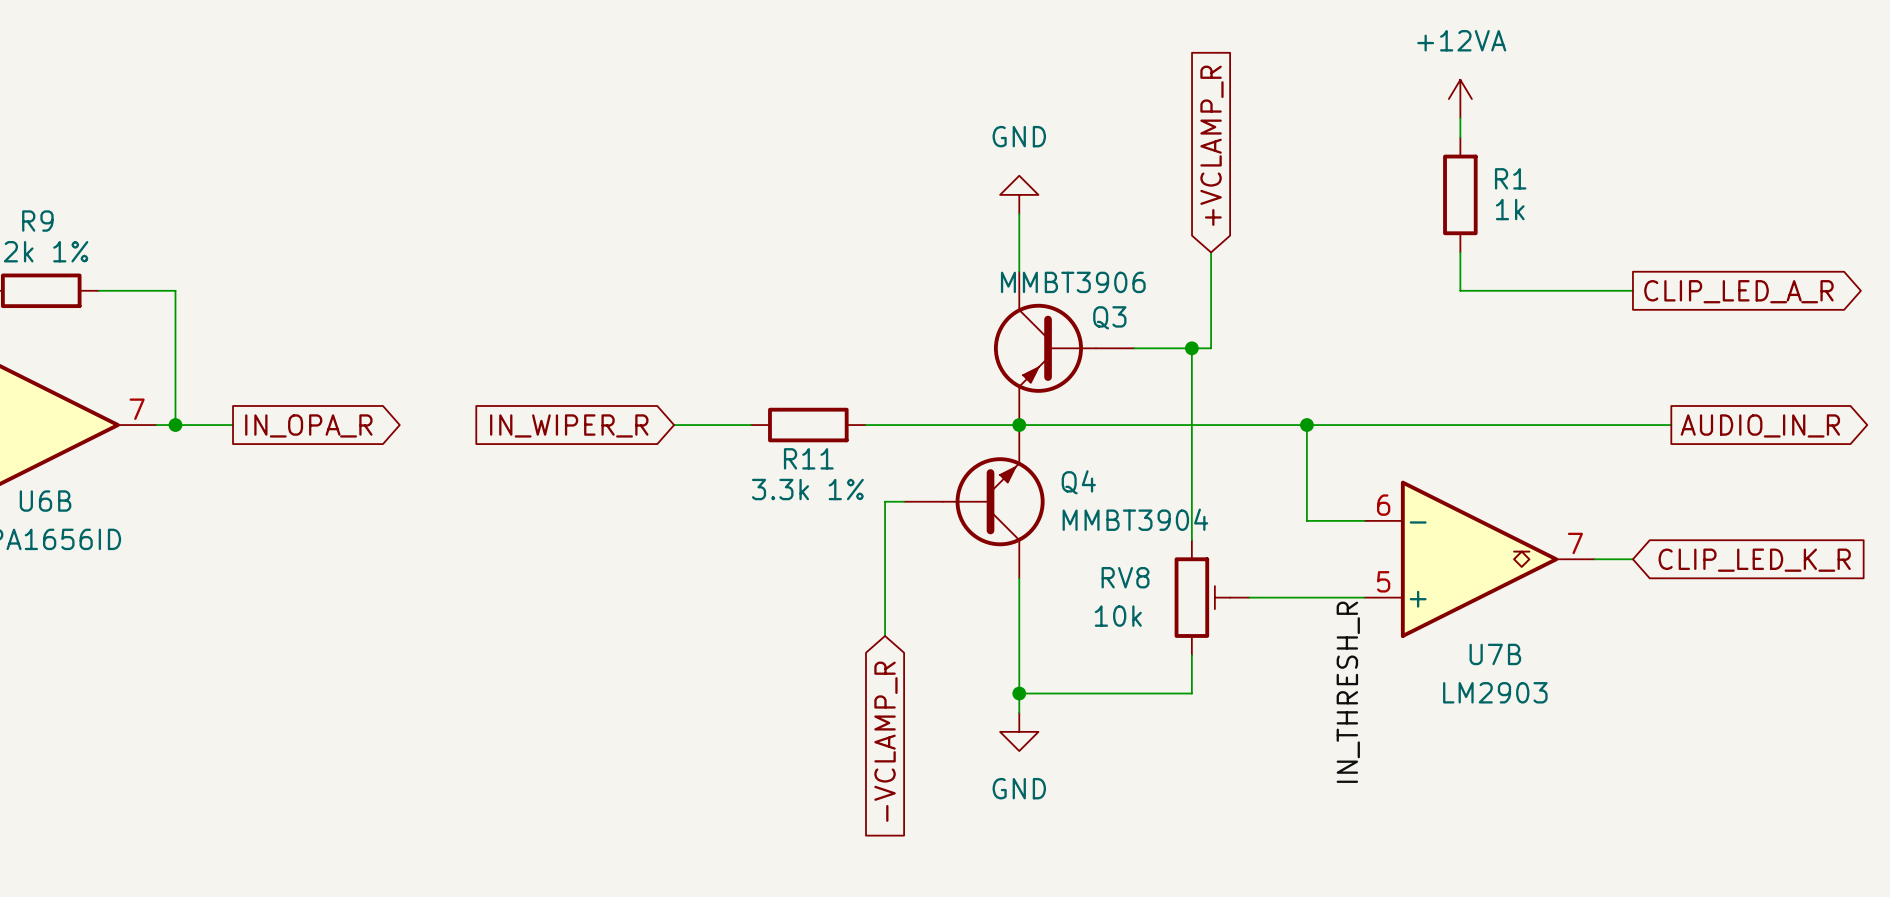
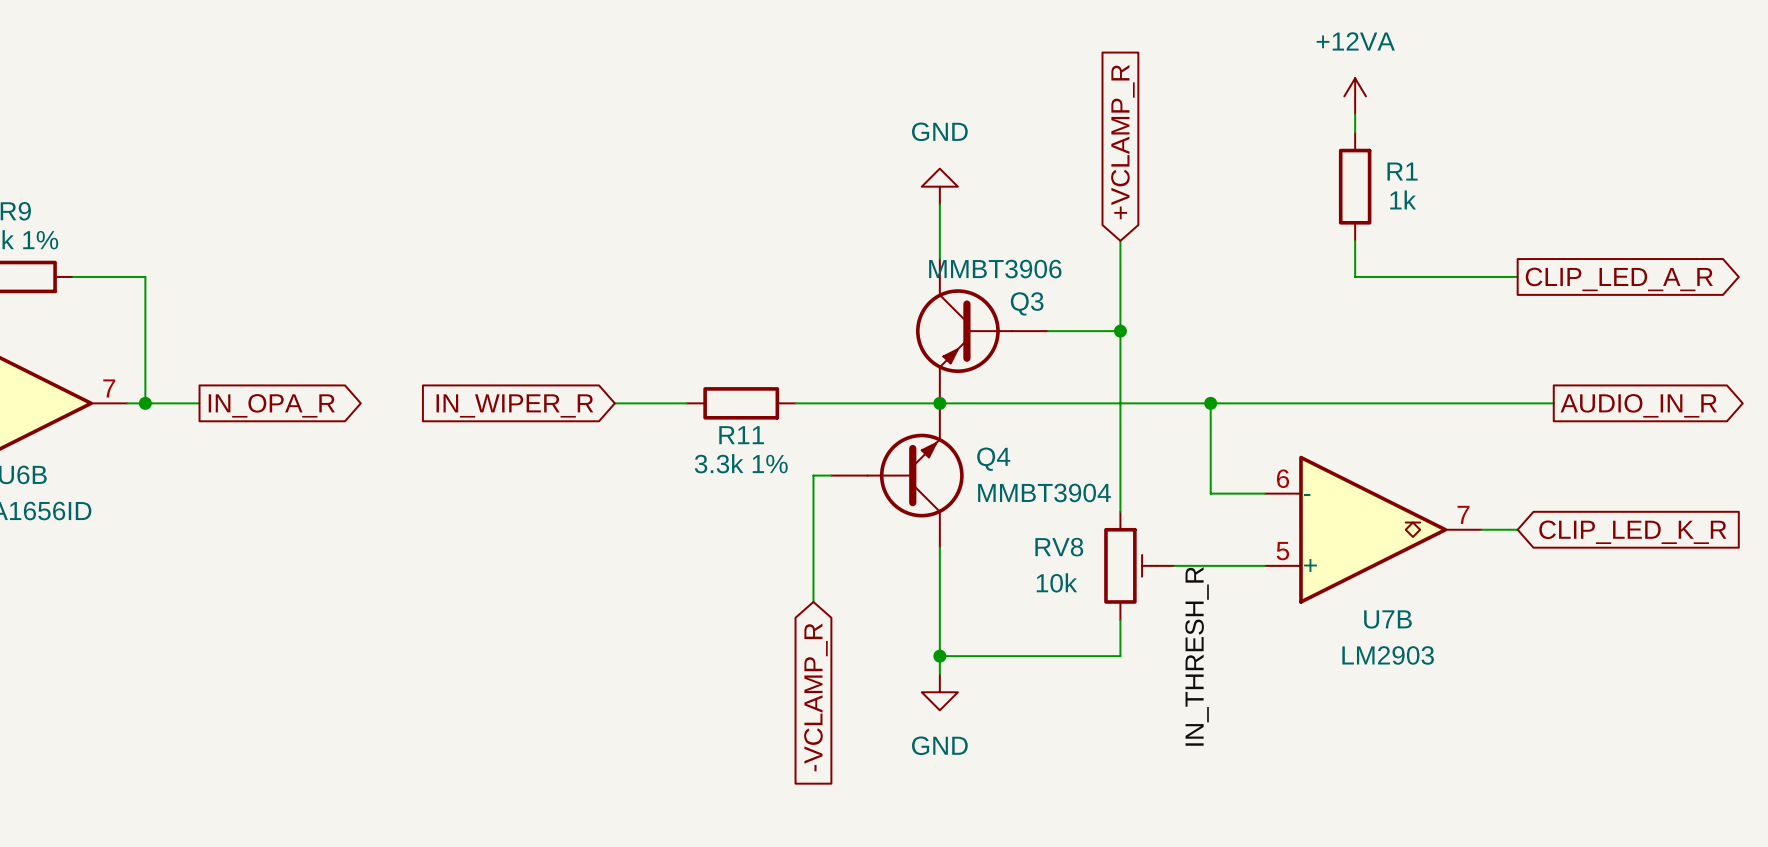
wire: (1191, 348) (1191, 540) -> (1120, 331) (1120, 511)
junction position: (1191, 348) -> (1120, 331)
RV8 position: (1212, 597) -> (1139, 565)
wire: (1191, 655) (1191, 693) -> (1120, 620) (1120, 656) (1102, 656)
label position: IN_THRESH_R (1348, 692) -> IN_THRESH_R (1197, 656)

